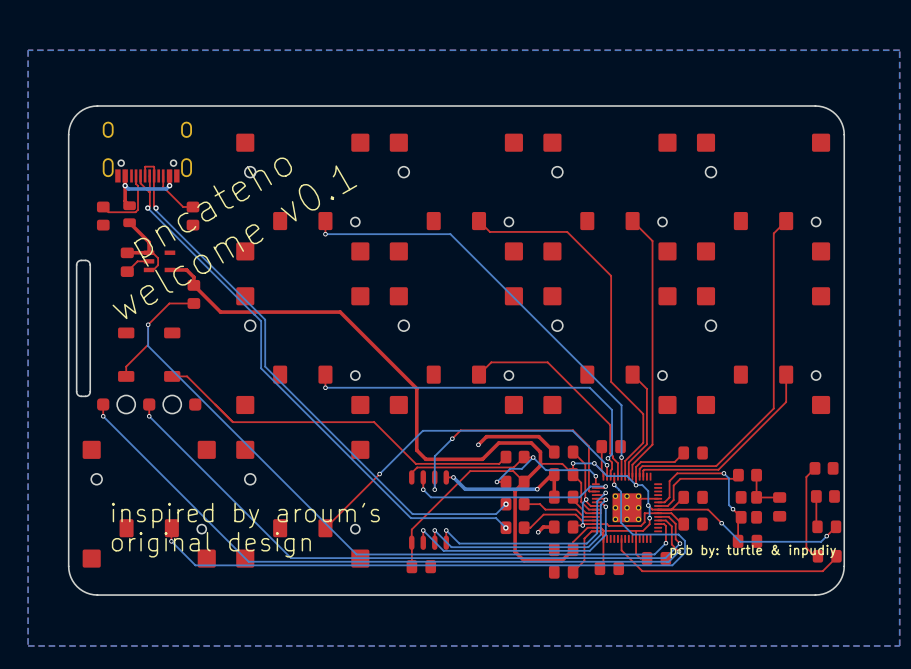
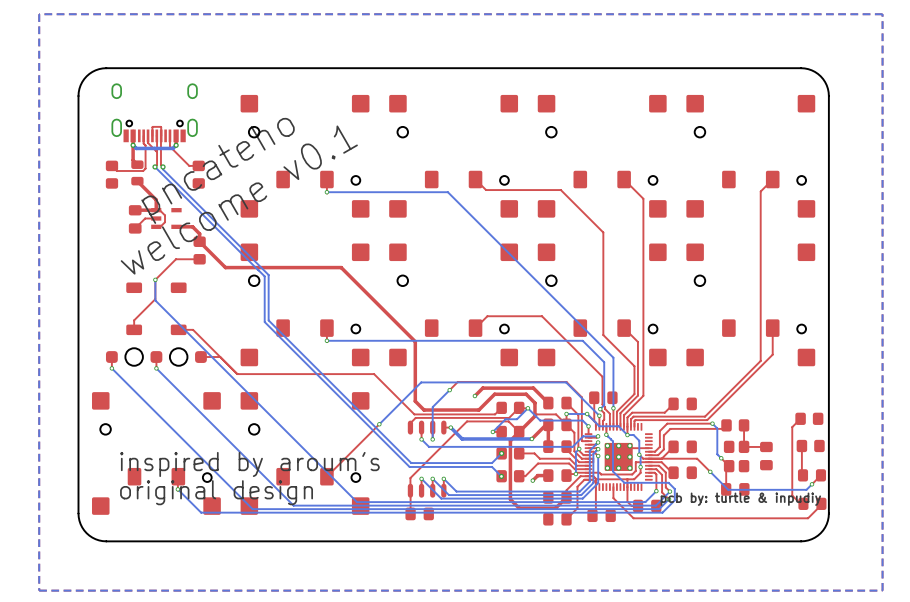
board edge: (85, 260) (78, 261) (76, 264) (76, 391) (81, 396) (87, 395) (90, 391) (90, 264) (85, 260) -> none
top track: none -> (220, 357) (200, 357)

